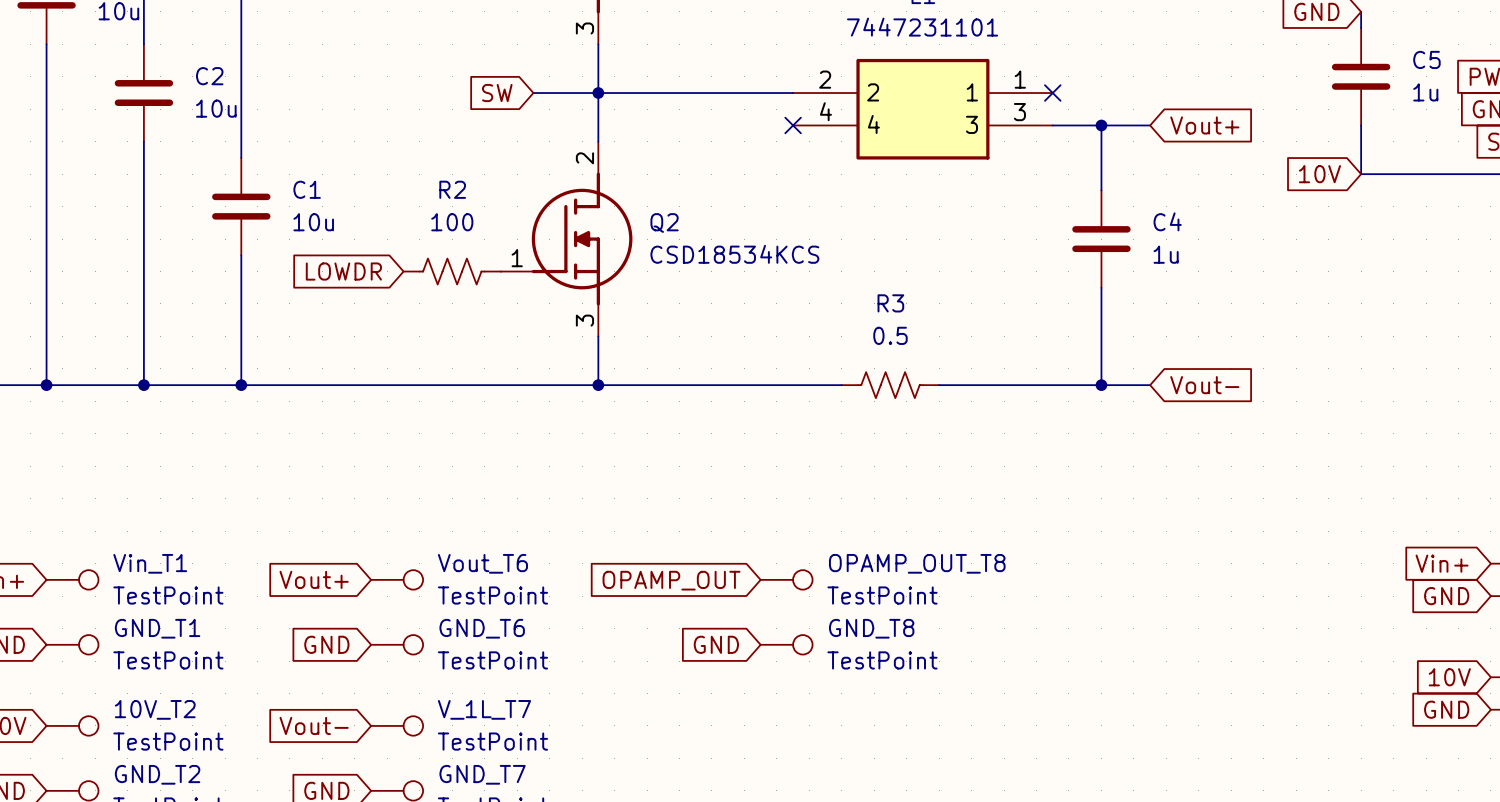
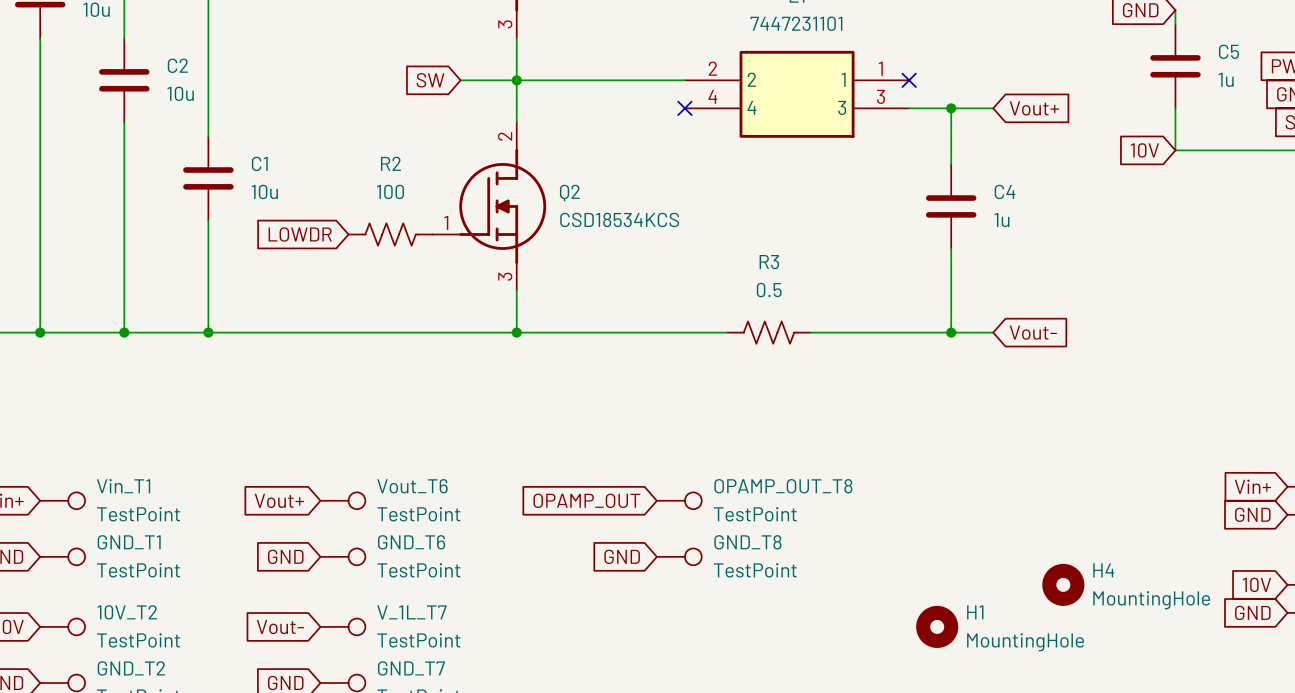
H4: none -> MountingHole (1063, 584)
H1: none -> MountingHole (937, 626)

